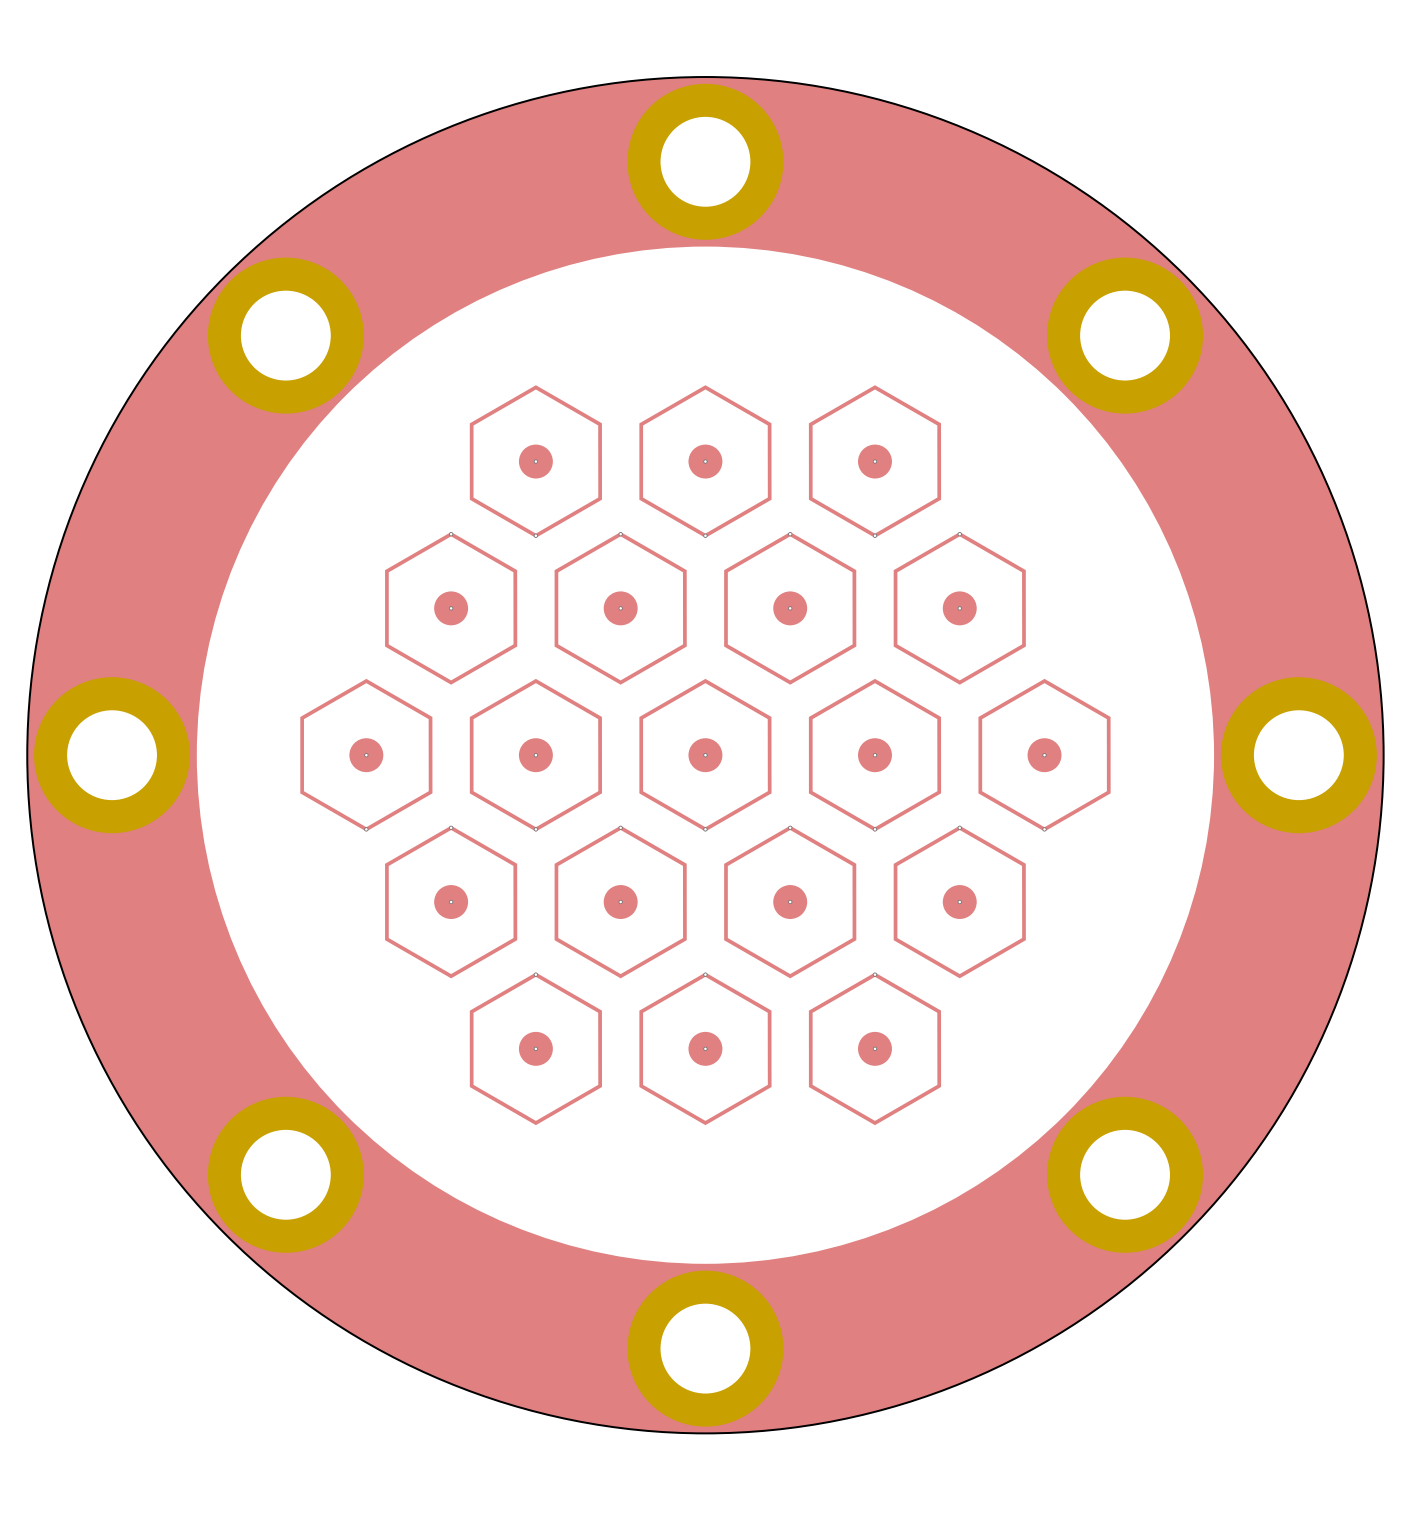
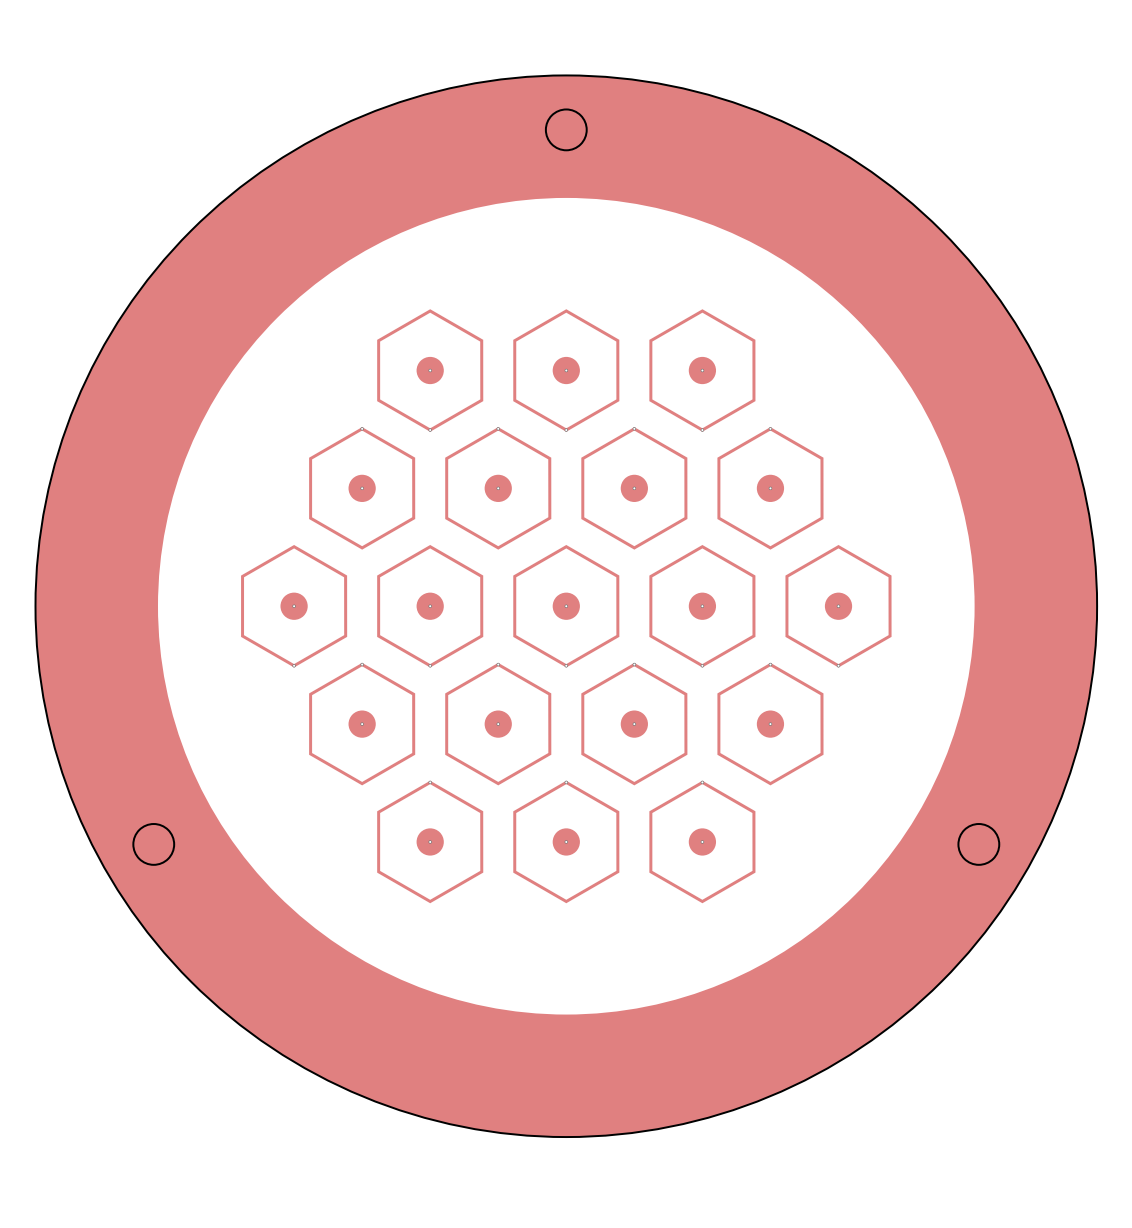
drawing shape: [27, 77, 1384, 1434] -> [35, 75, 1098, 1138]
round board edge size: [27, 77, 1384, 1434] -> [35, 75, 1098, 1138]
round board edge: none -> [545, 109, 587, 151]
part: (705, 161) -> none
part: (285, 335) -> none
part: (1125, 335) -> none
part: (112, 755) -> none
part: (1298, 755) -> none
round board edge: none -> [133, 823, 175, 865]
round board edge: none -> [958, 823, 1000, 865]
part: (285, 1174) -> none
part: (1125, 1174) -> none
part: (705, 1348) -> none

